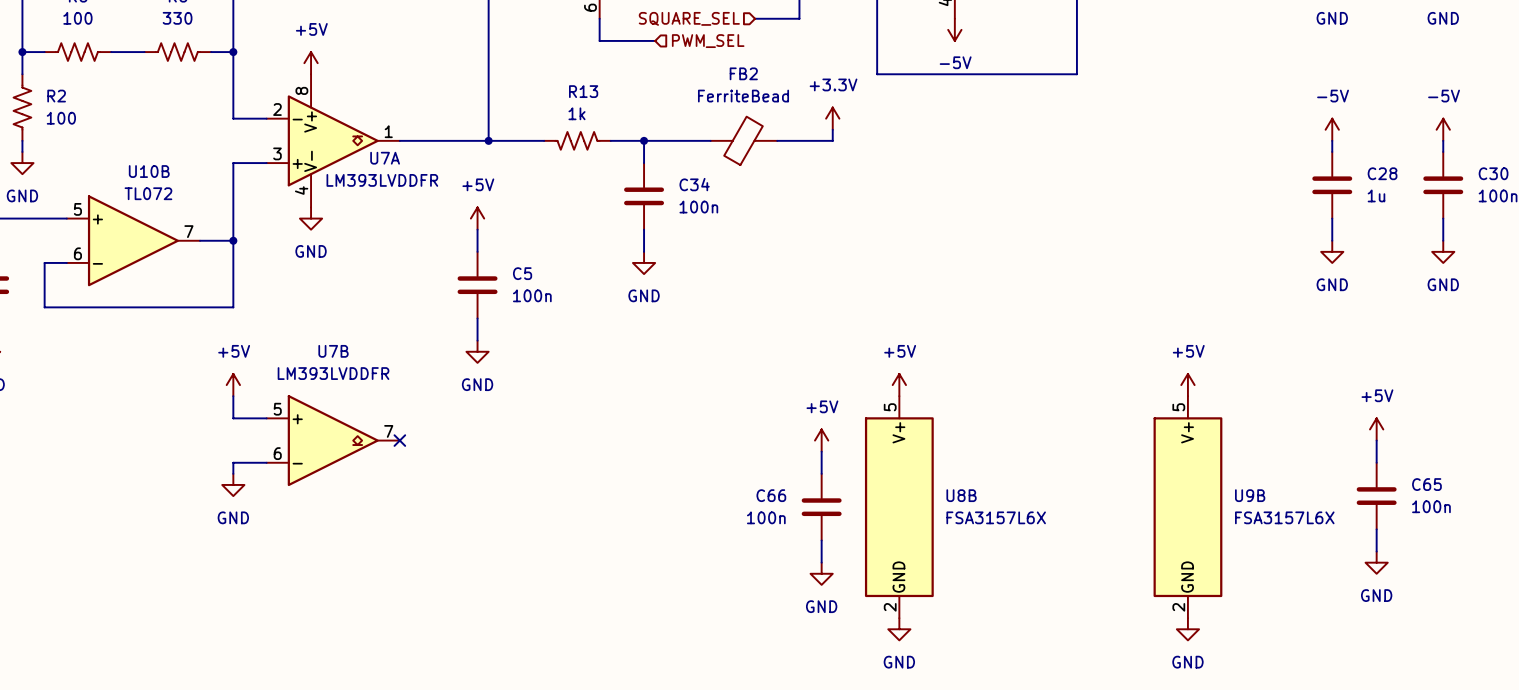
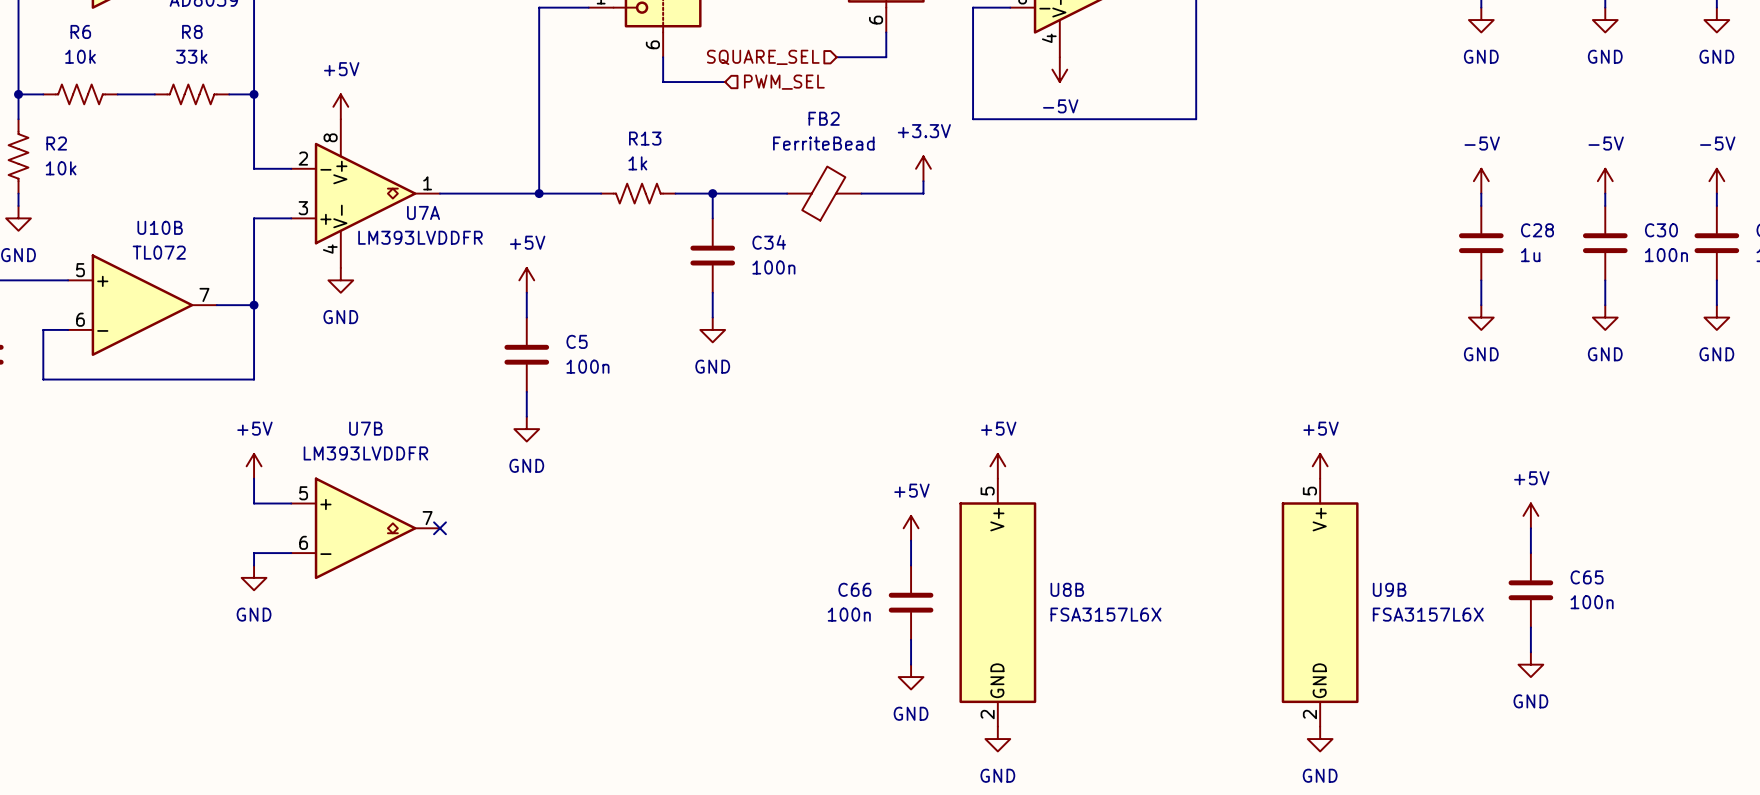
R6 value: 100 (77, 18) -> 10k (80, 56)
R8 value: 330 (177, 18) -> 33k (191, 56)
R2 value: 100 (61, 118) -> 10k (61, 168)

